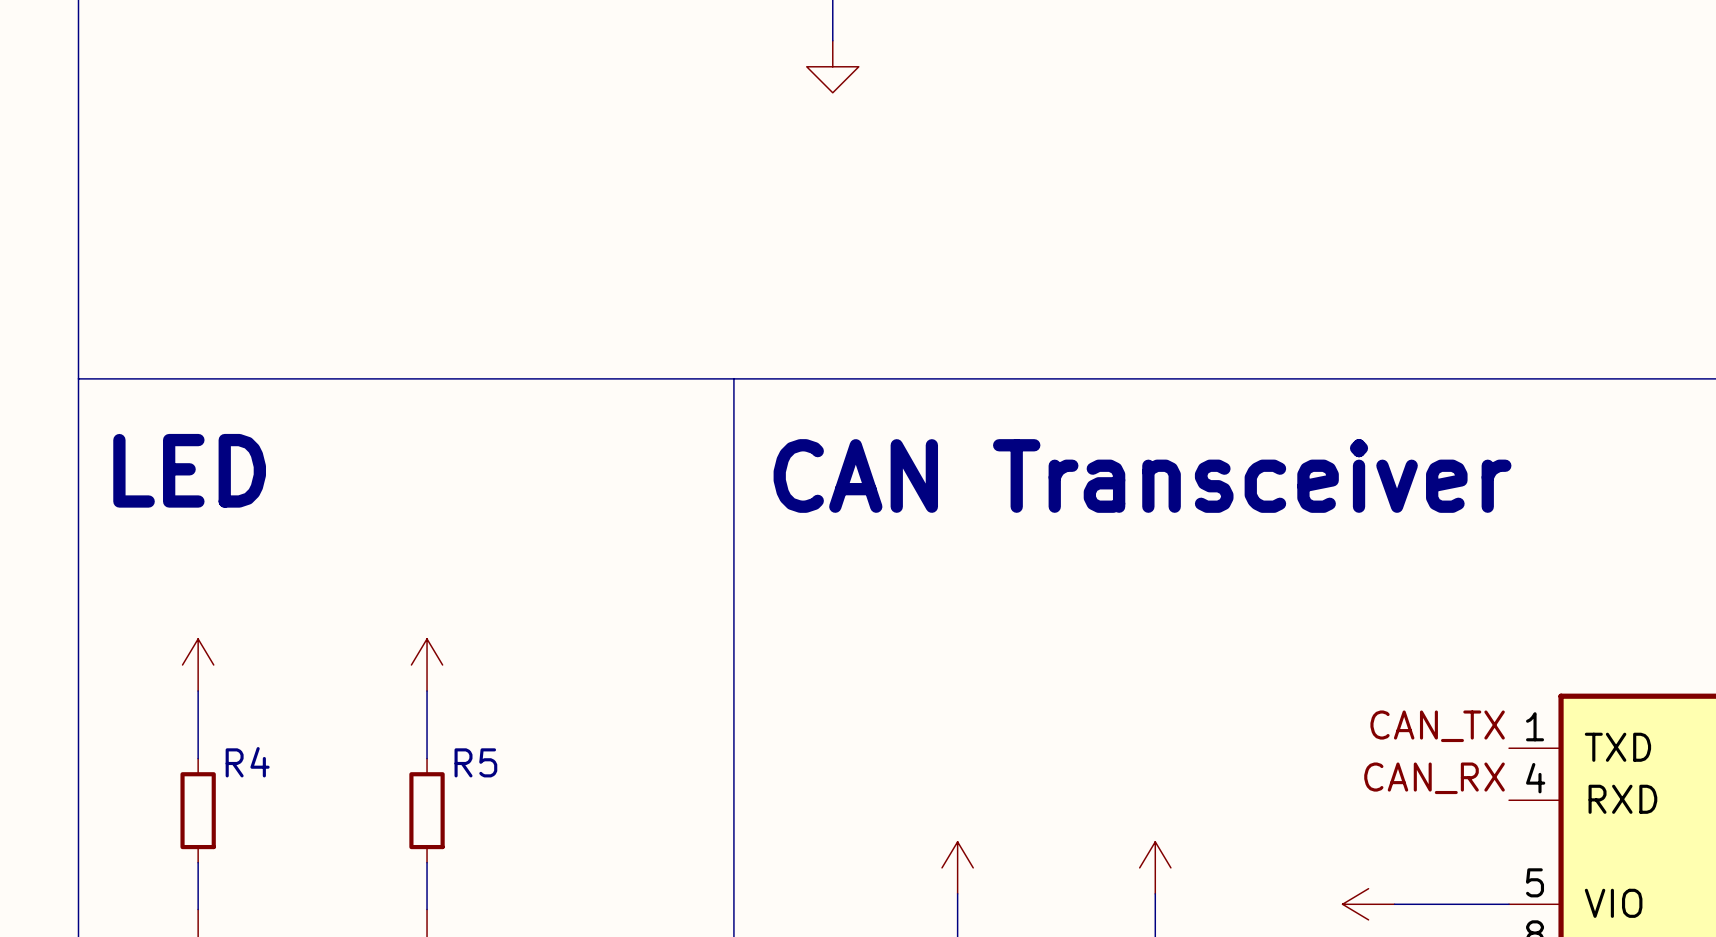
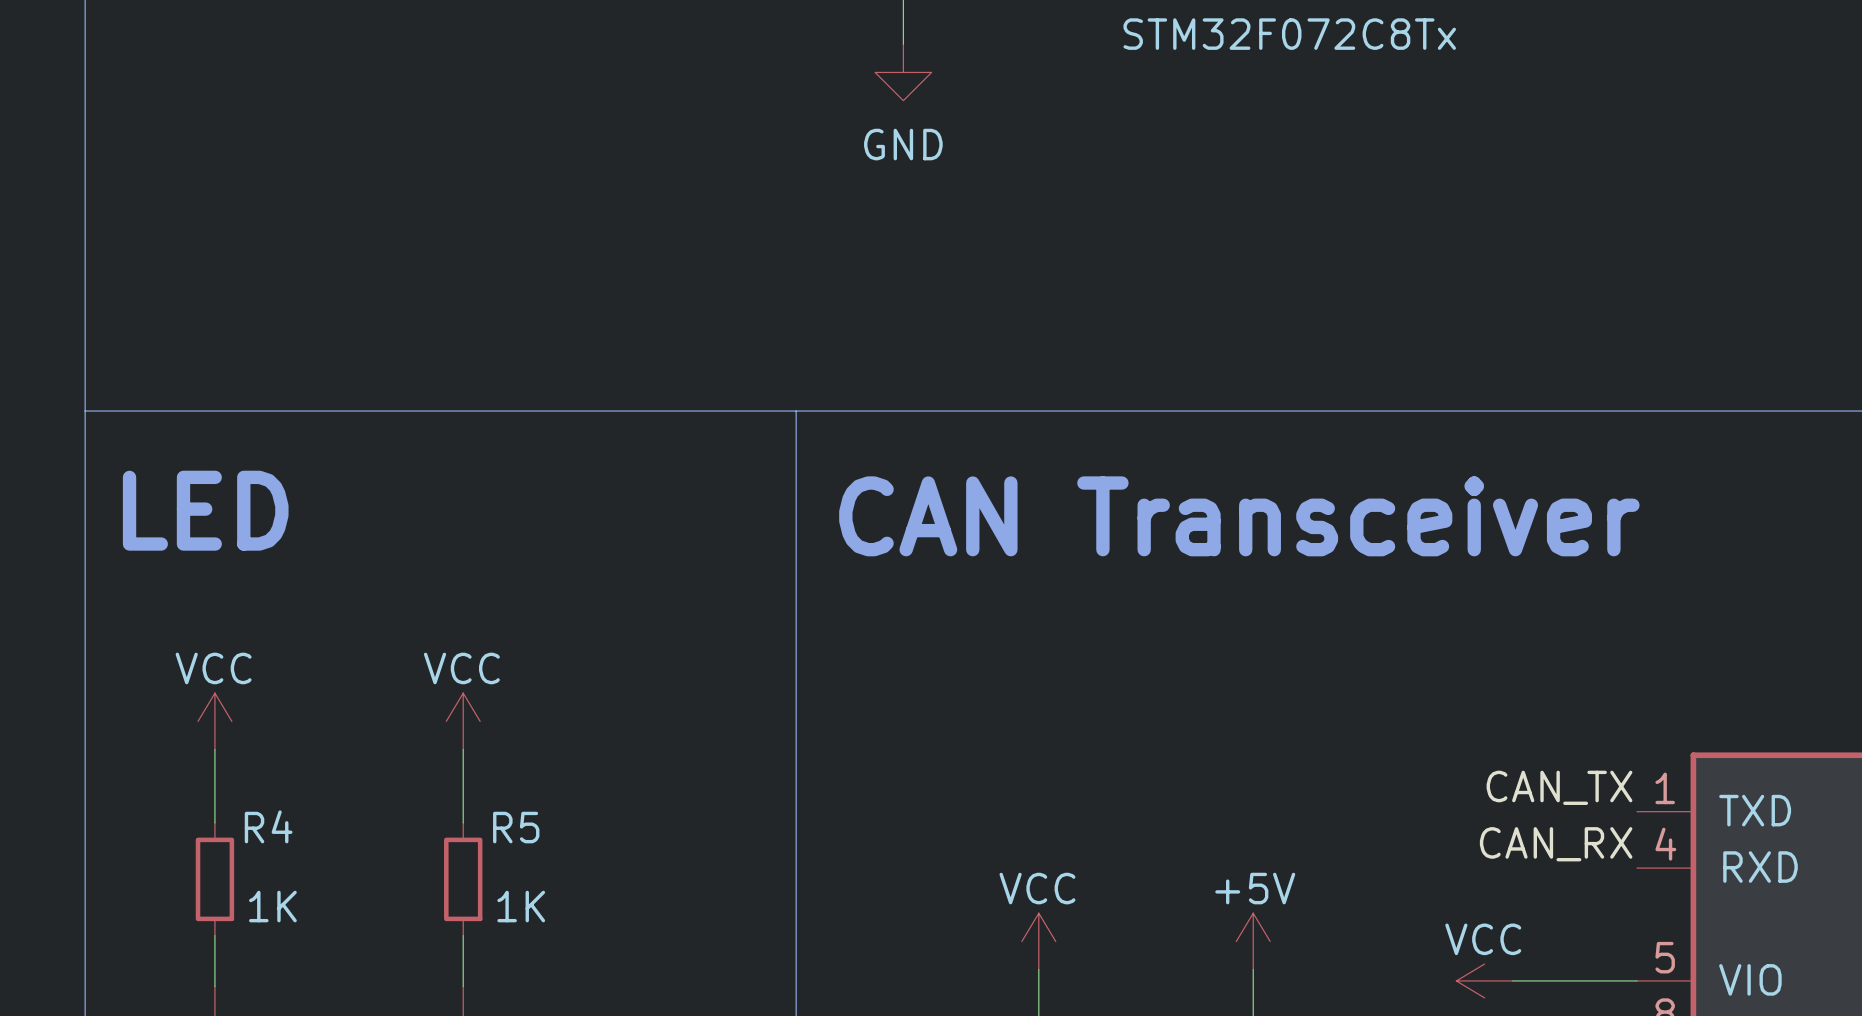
part value: none -> STM32F072C8Tx (1289, 34)
power symbol text: none -> GND (903, 144)
power symbol text: none -> VCC (213, 668)
power symbol text: none -> VCC (461, 668)
power symbol text: none -> VCC (1037, 888)
power symbol text: none -> +5V (1255, 888)
R4 value: none -> 1K (272, 906)
R5 value: none -> 1K (521, 906)
power symbol text: none -> VCC (1483, 939)

